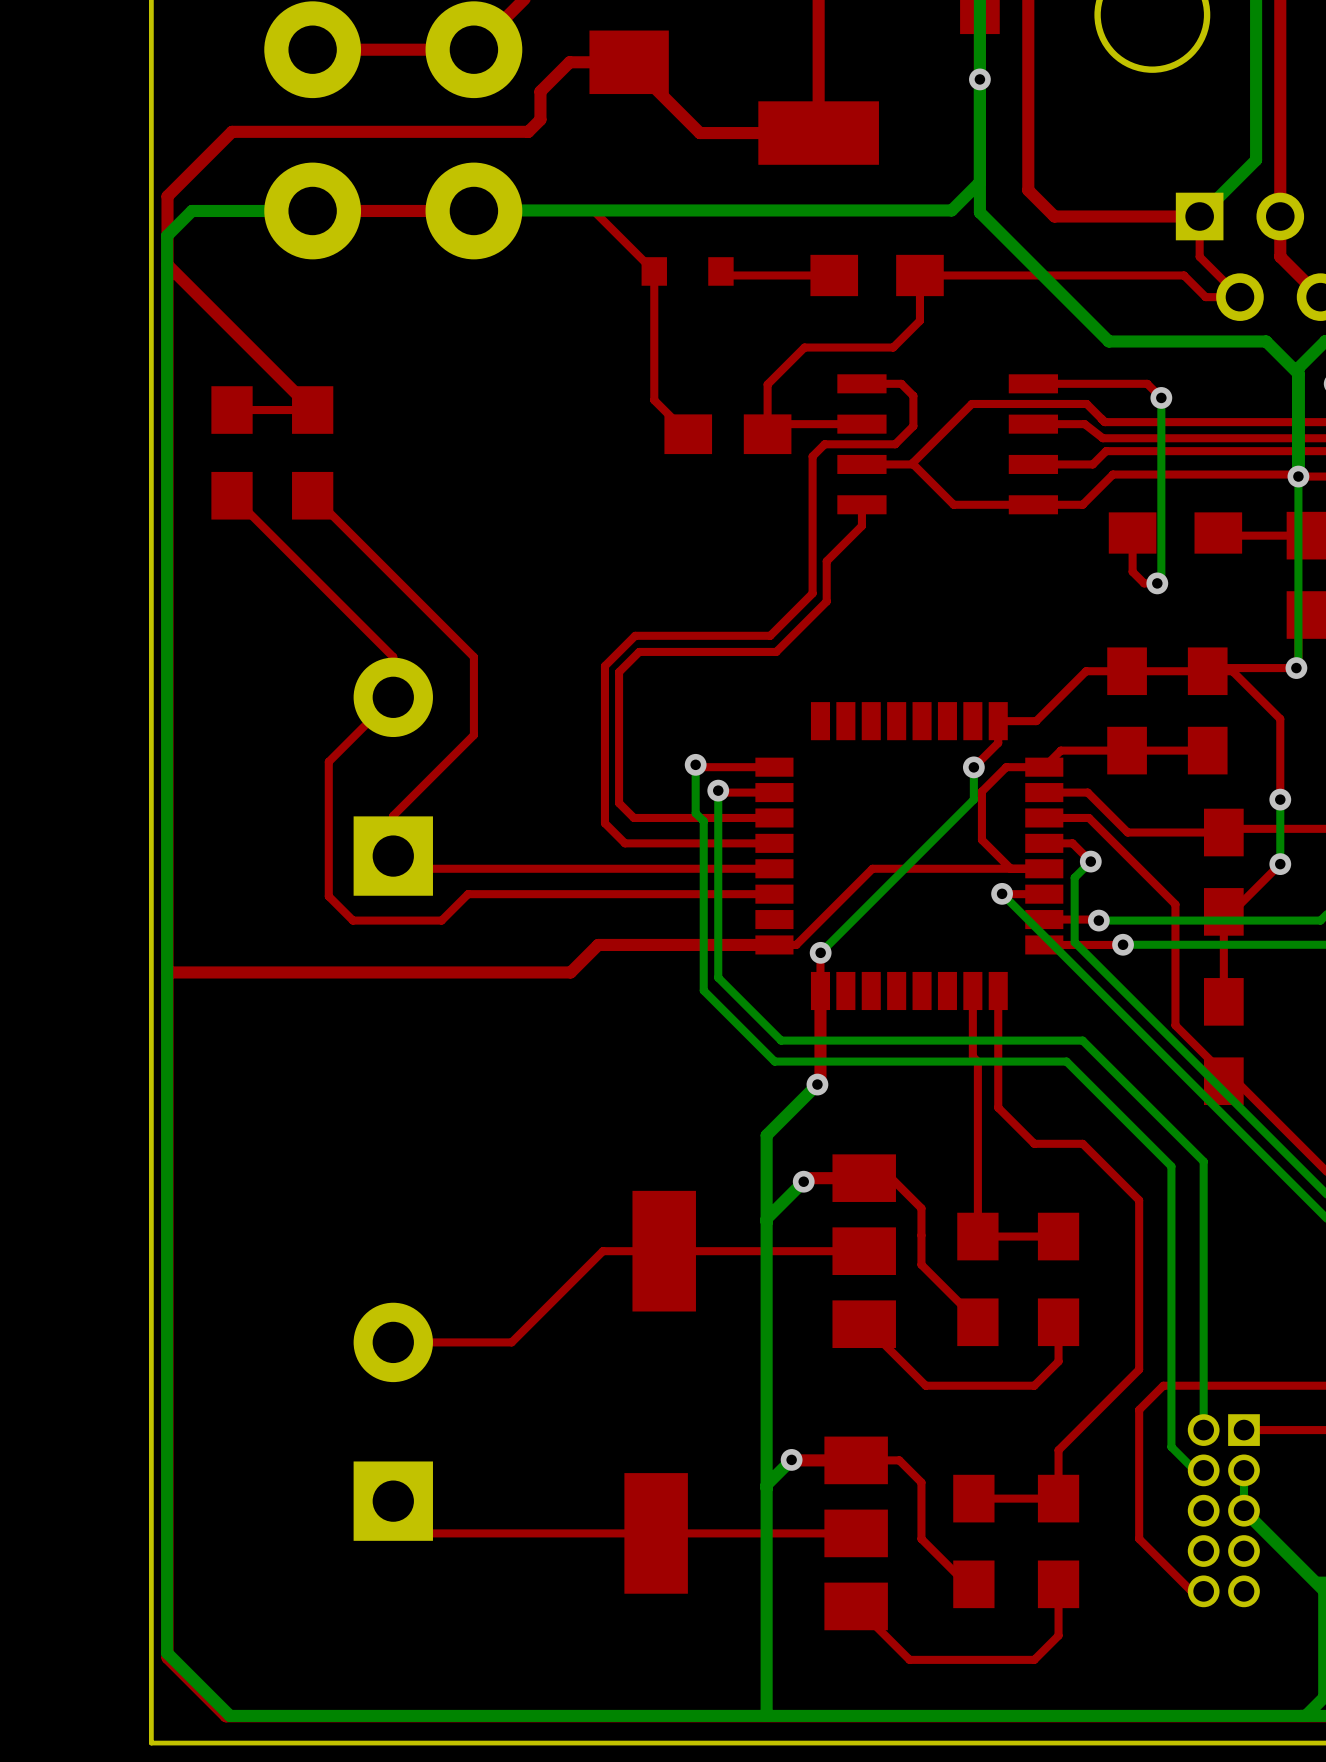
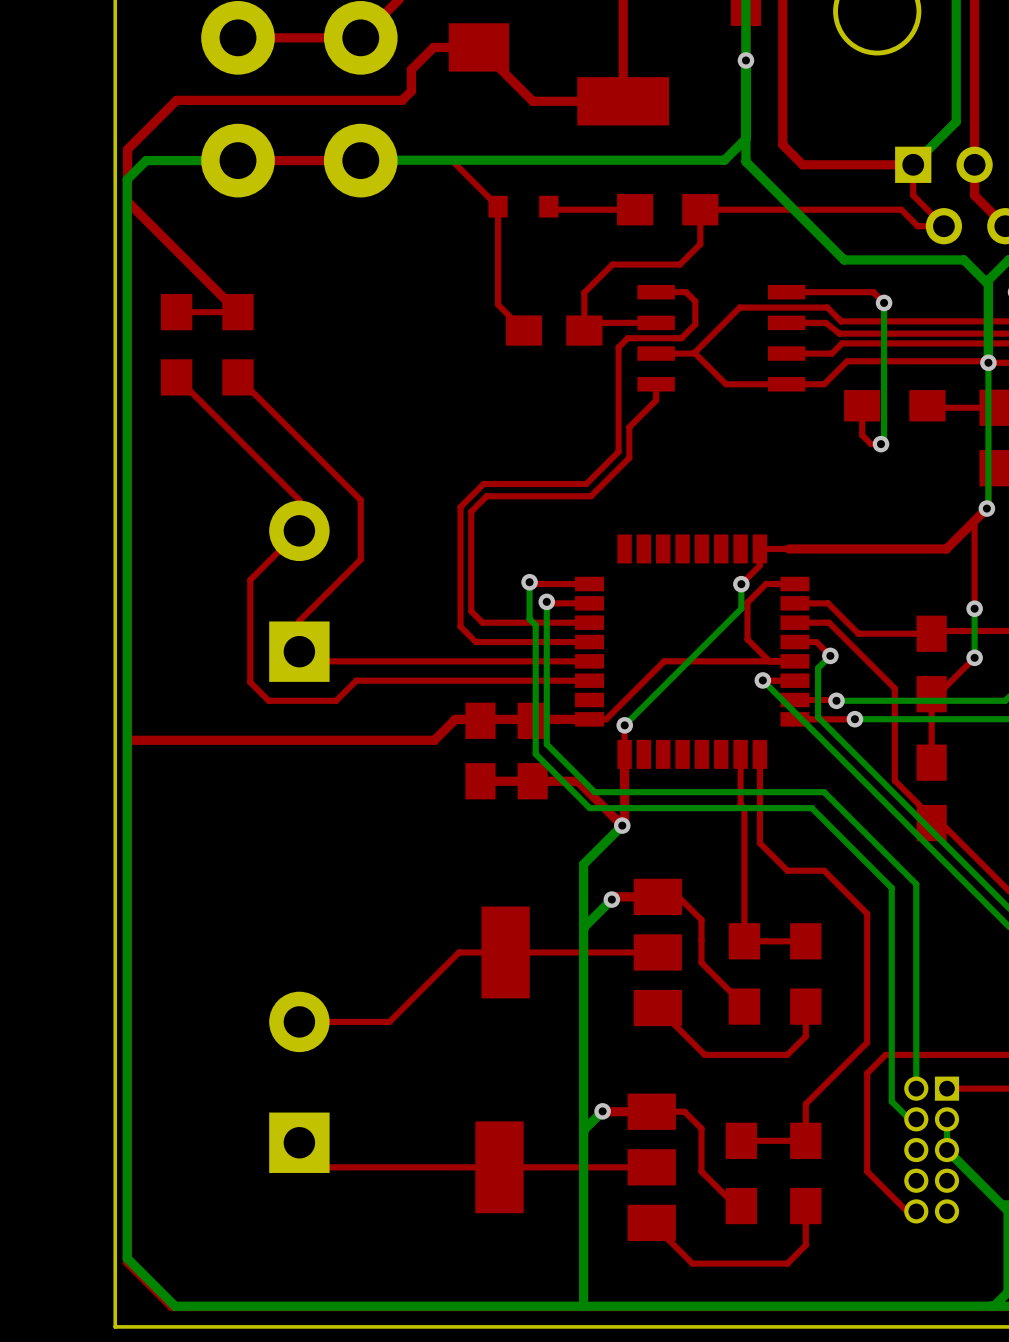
top track: (1296, 668) (1210, 668) (1207, 671) -> none
part: (1127, 710) -> none
part: (1207, 710) -> none
top track: (1280, 718) (1232, 671) (1086, 671) (1036, 721) -> (974, 547) (974, 520) (986, 508) (946, 548) (788, 548)
top track: (1207, 750) (1060, 750) (1044, 767) -> none
part: none -> (480, 751)
part: none -> (532, 751)
top track: none -> (480, 781) (577, 781) (622, 825)

